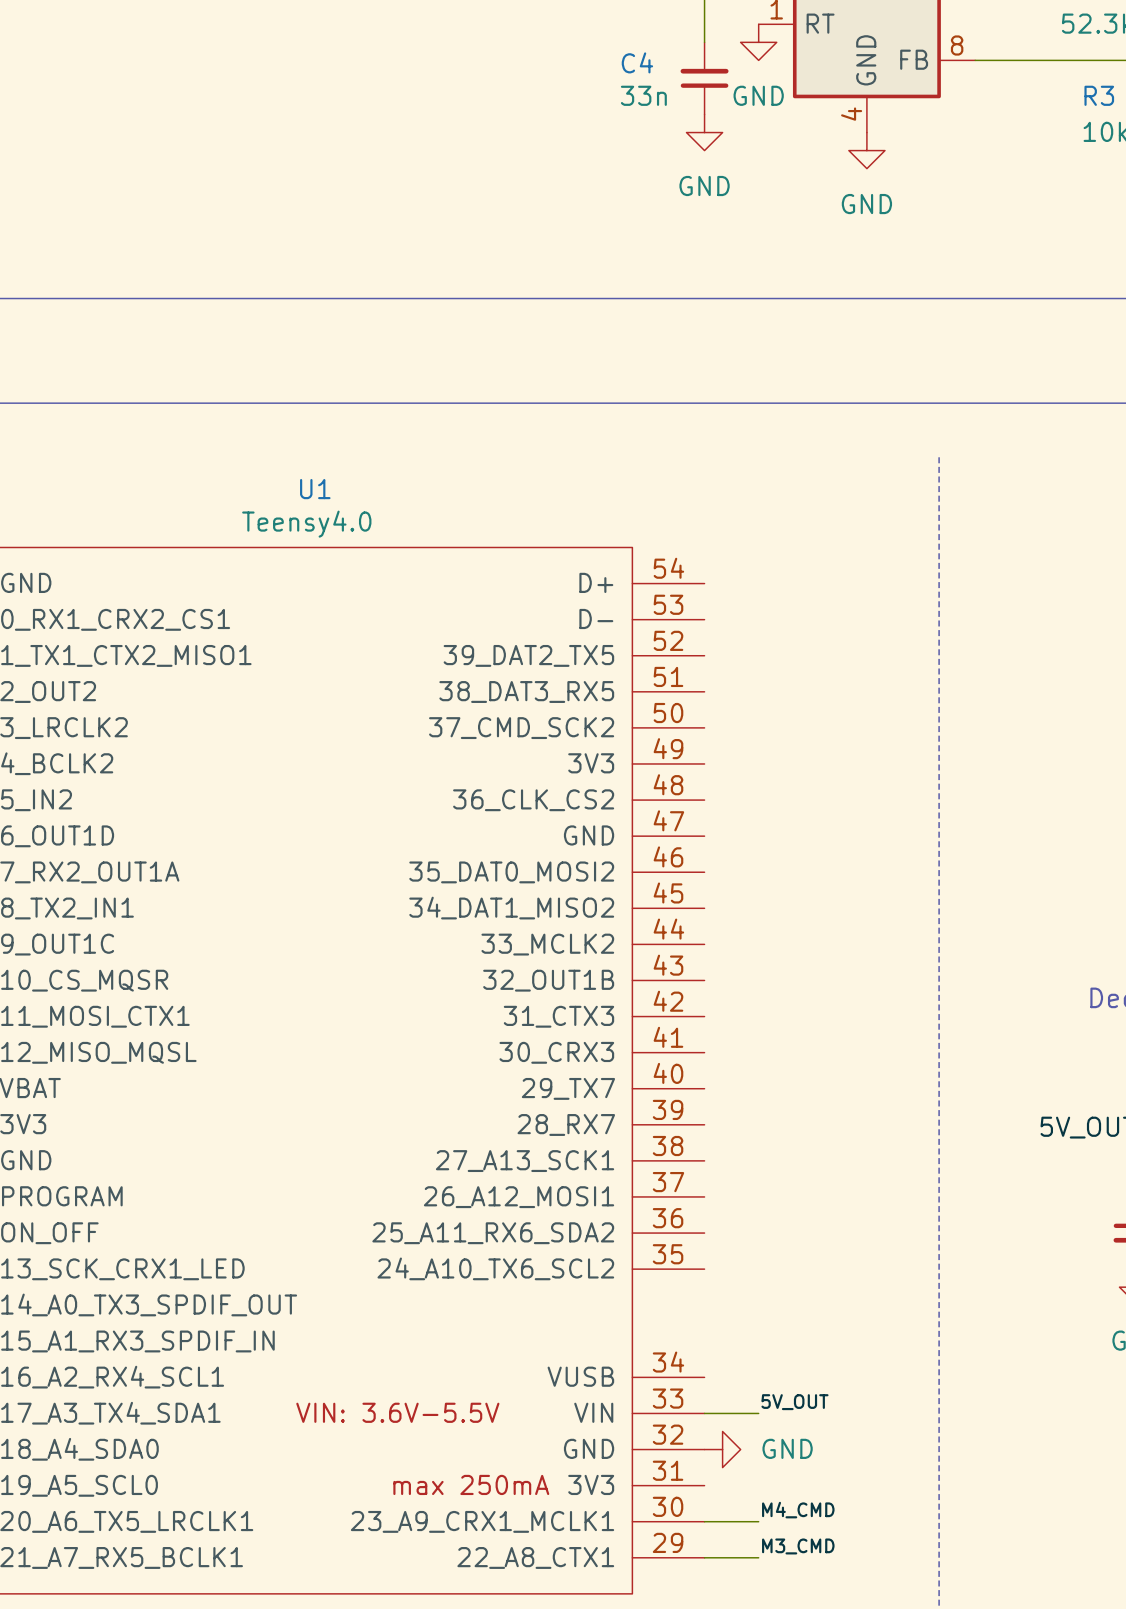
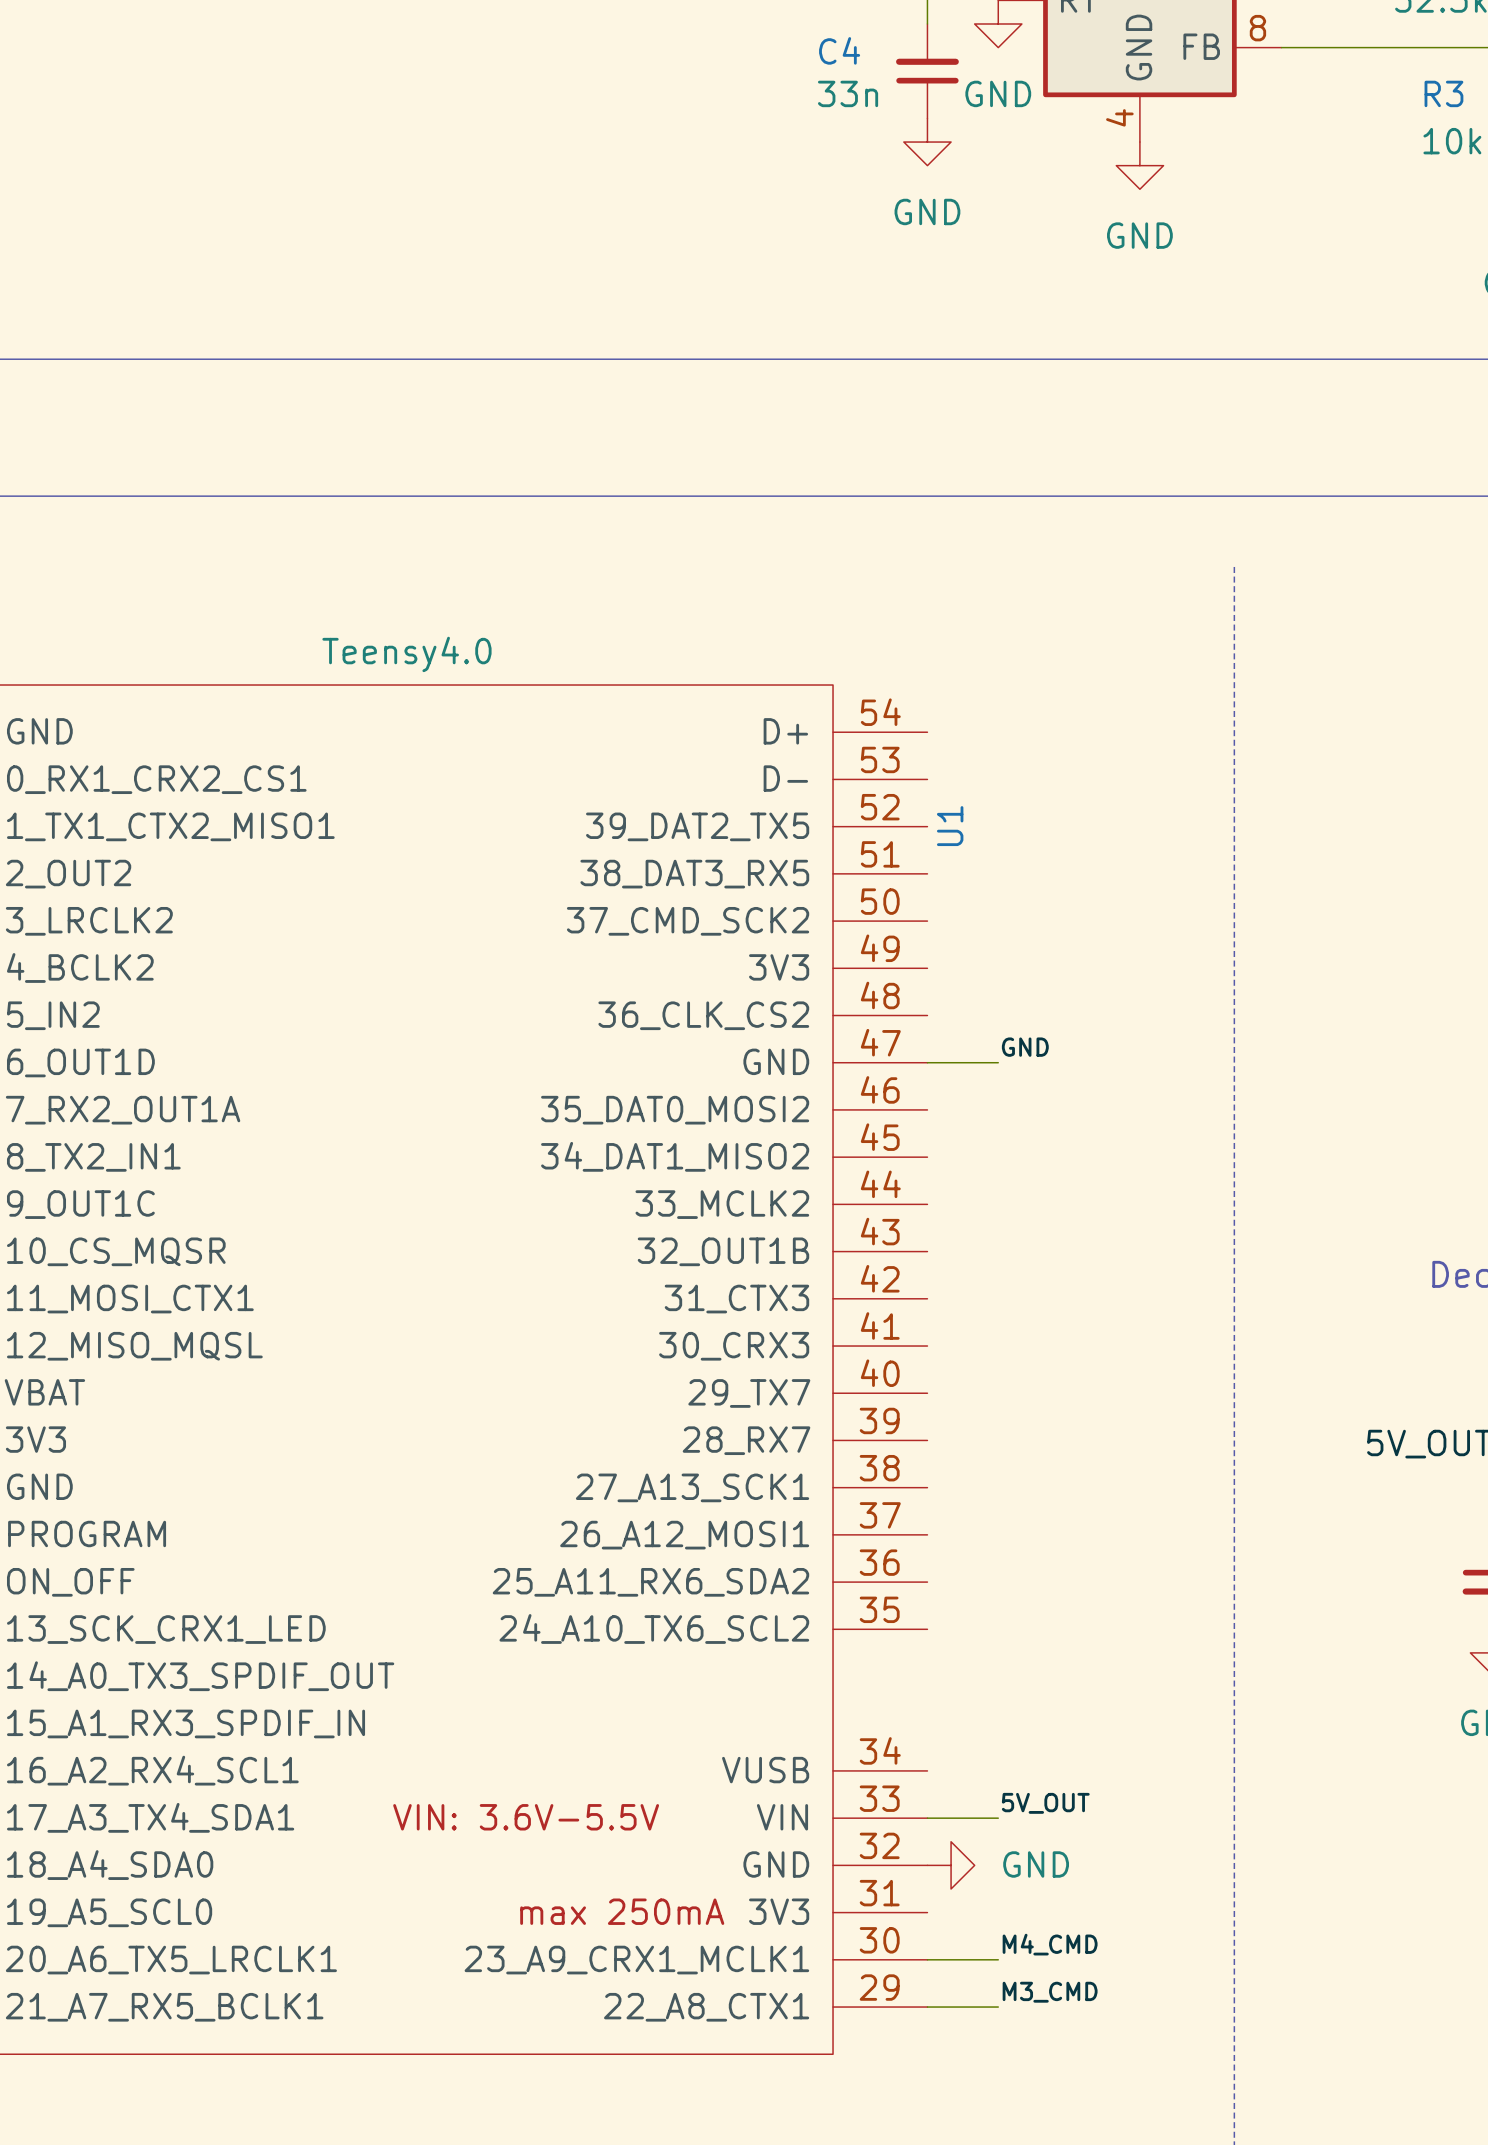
U1 name rotation: 0° (315, 489) -> 90° counterclockwise (950, 826)
U1 name position: U1 (315, 489) -> U1 (950, 826)
label: none -> GND (1025, 1047)
wire: none -> (927, 1062) (998, 1062)

